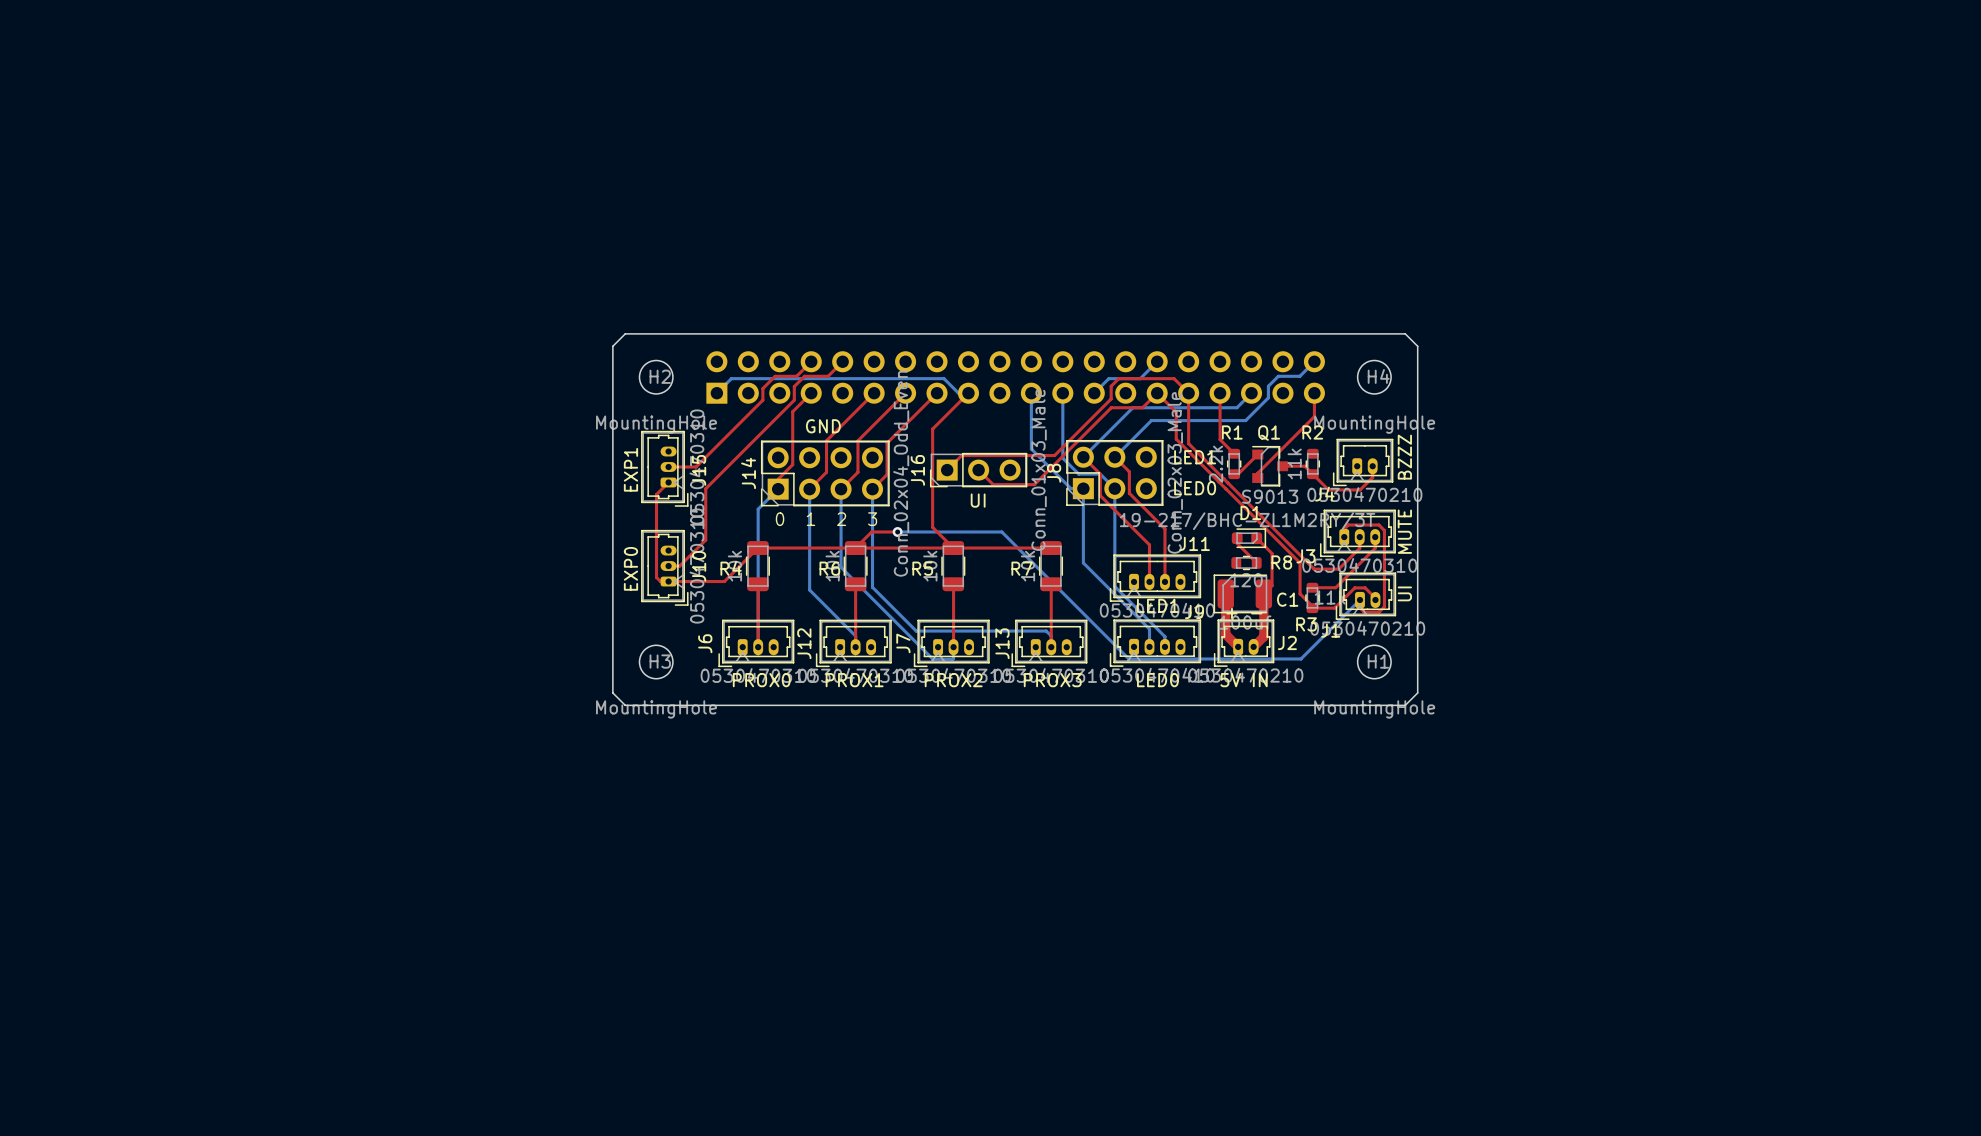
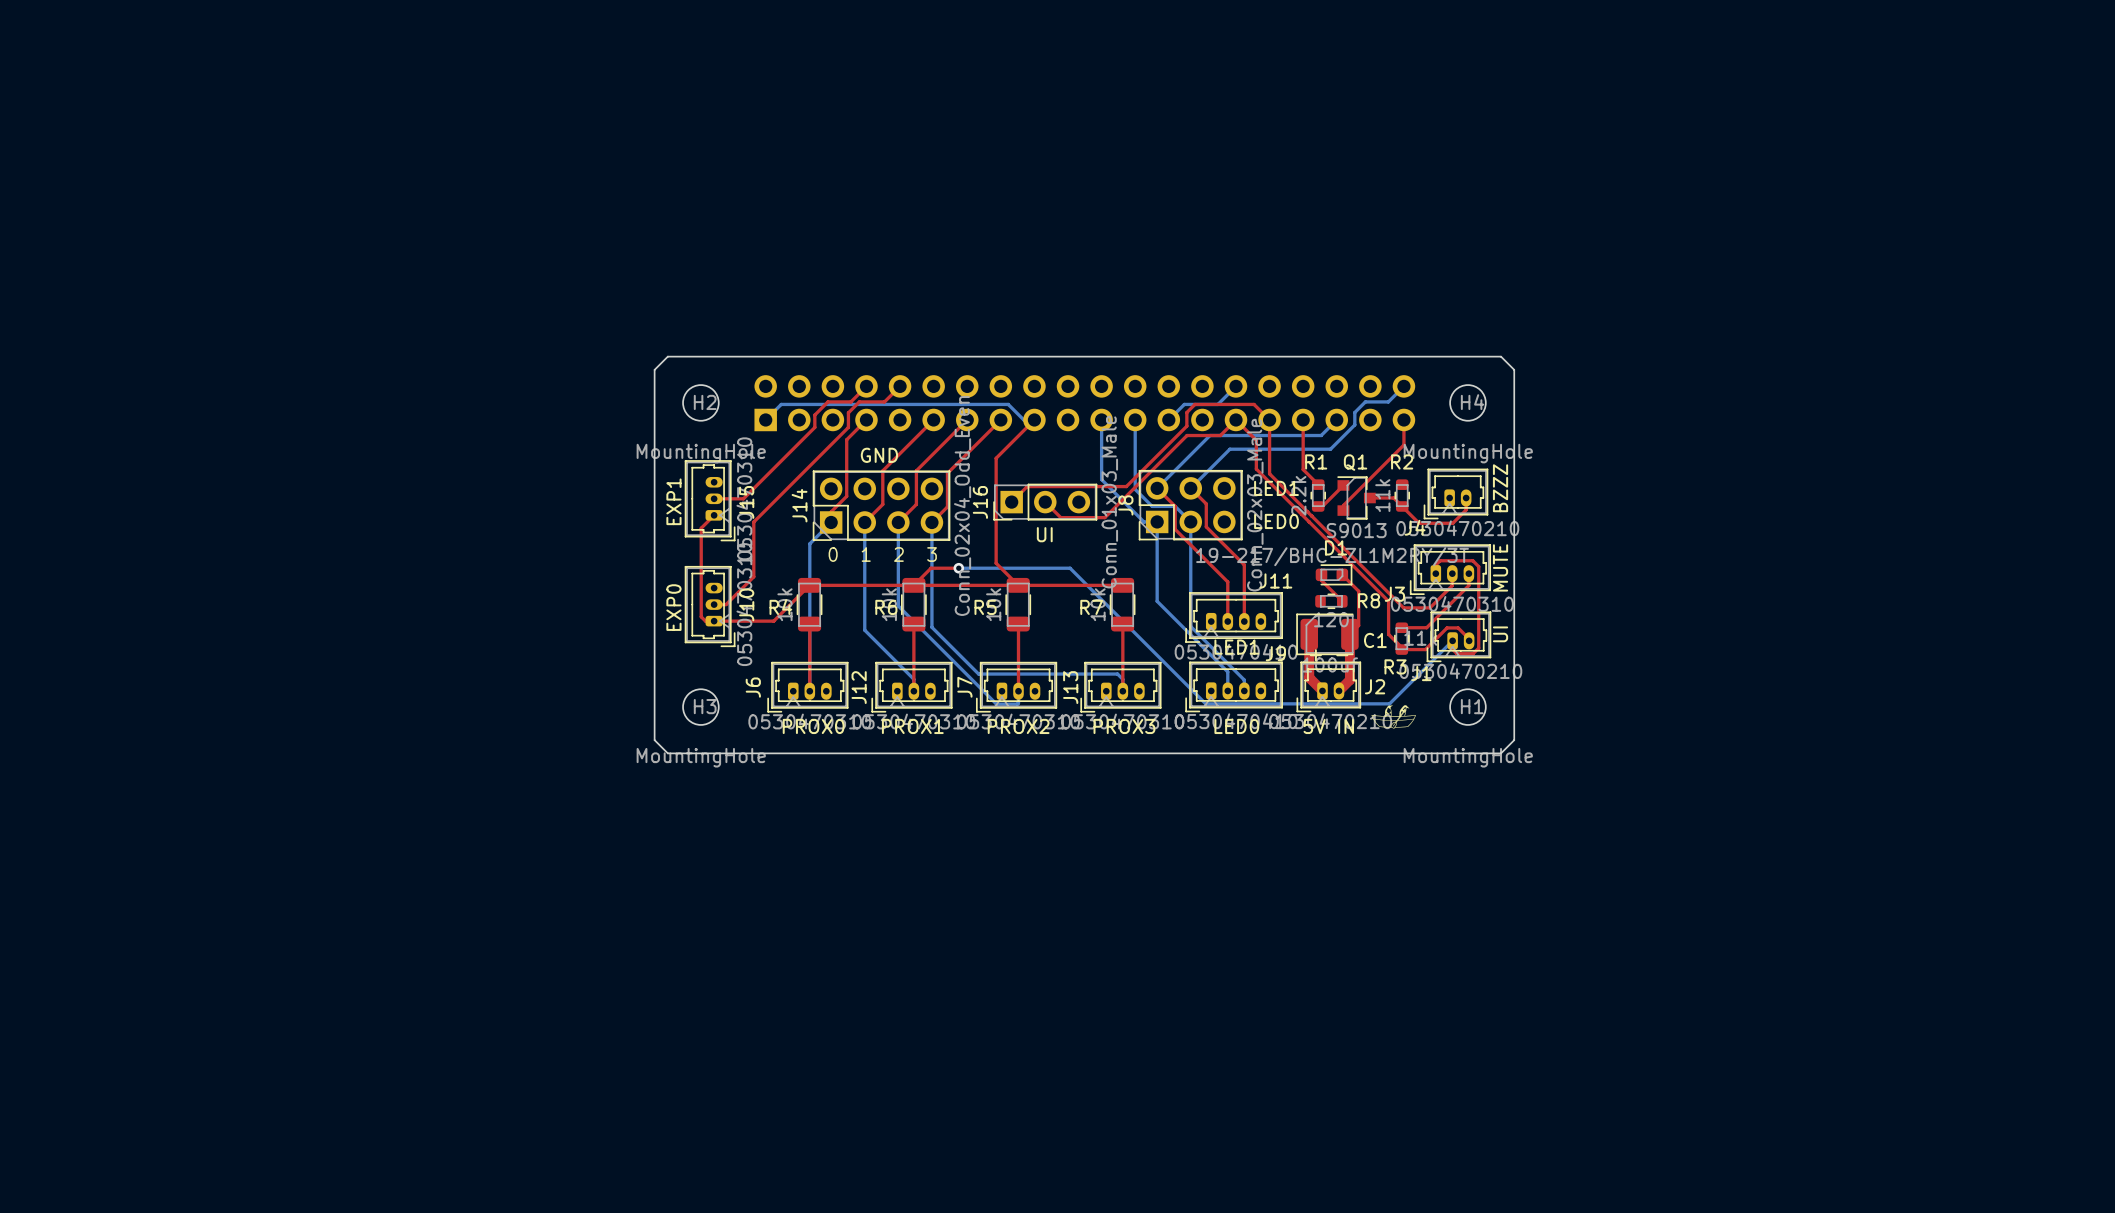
drawing: none -> [1371, 705, 1416, 729]

